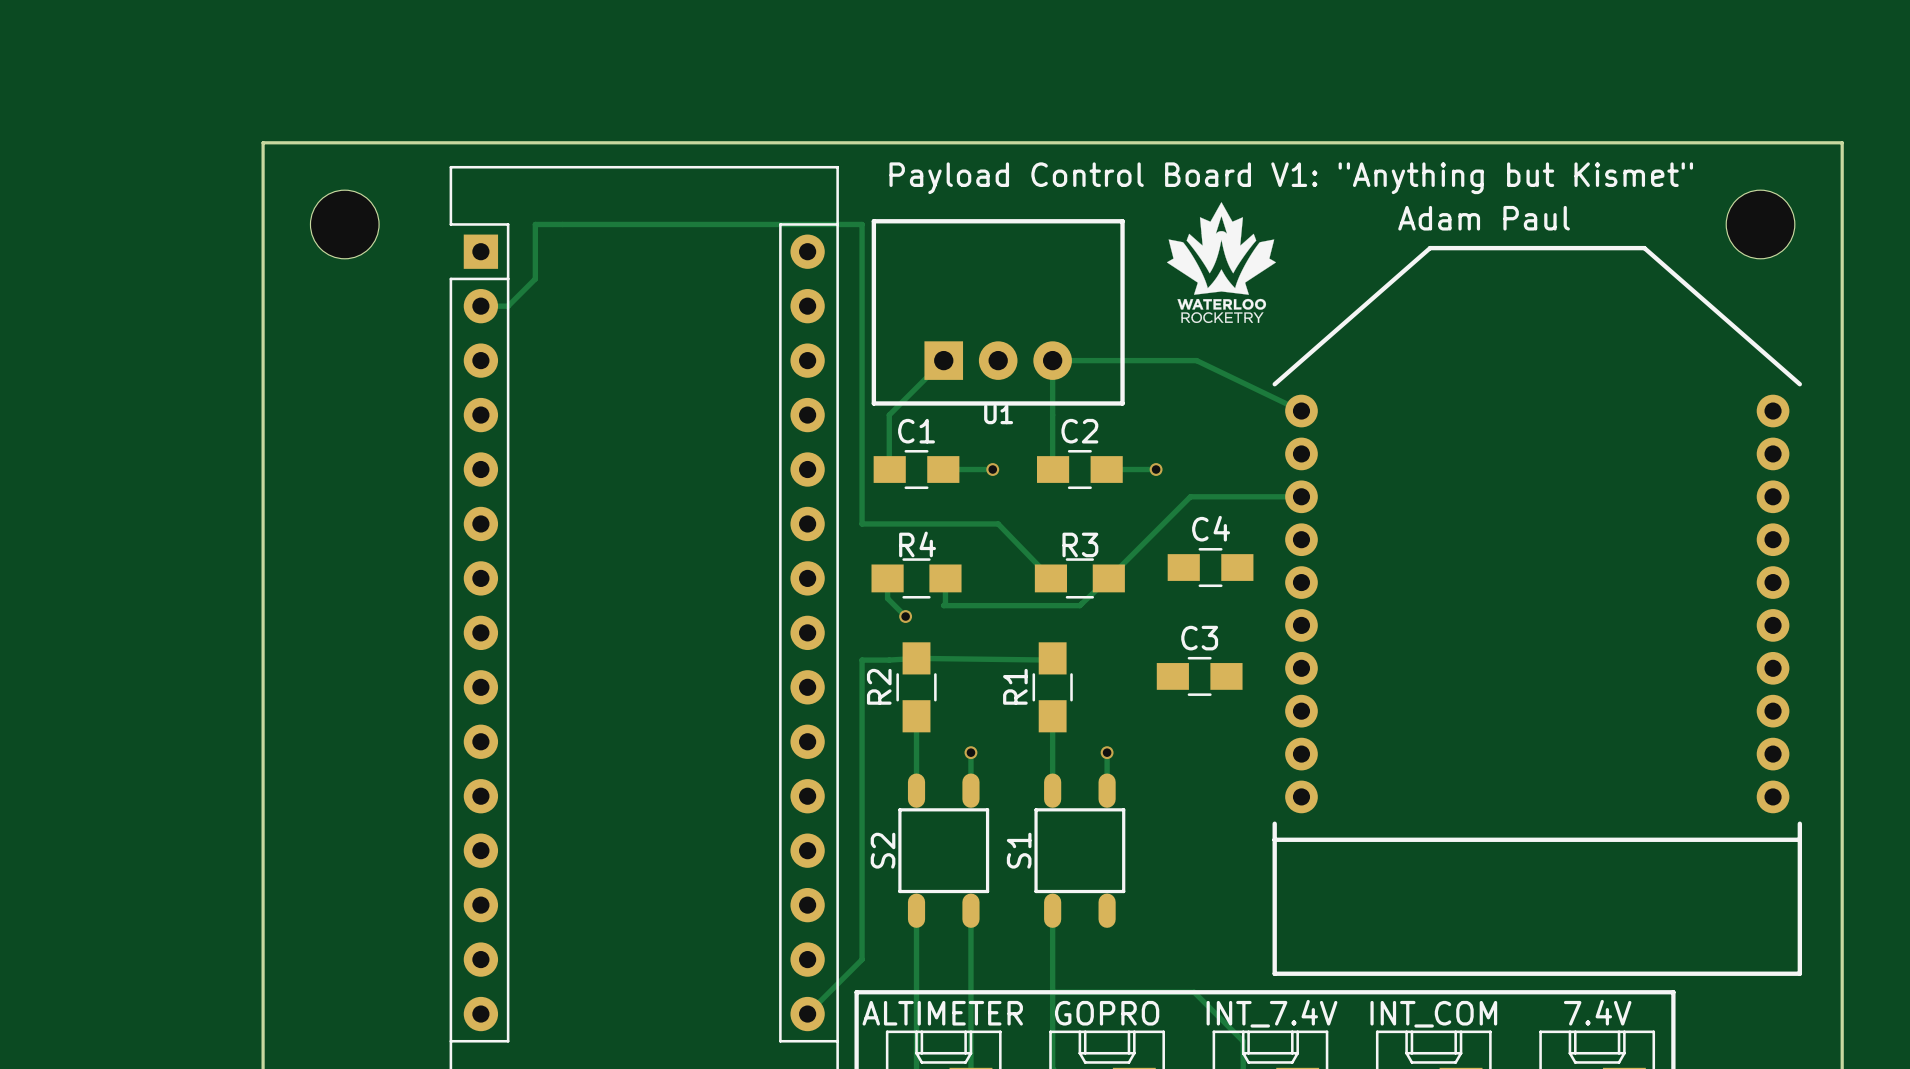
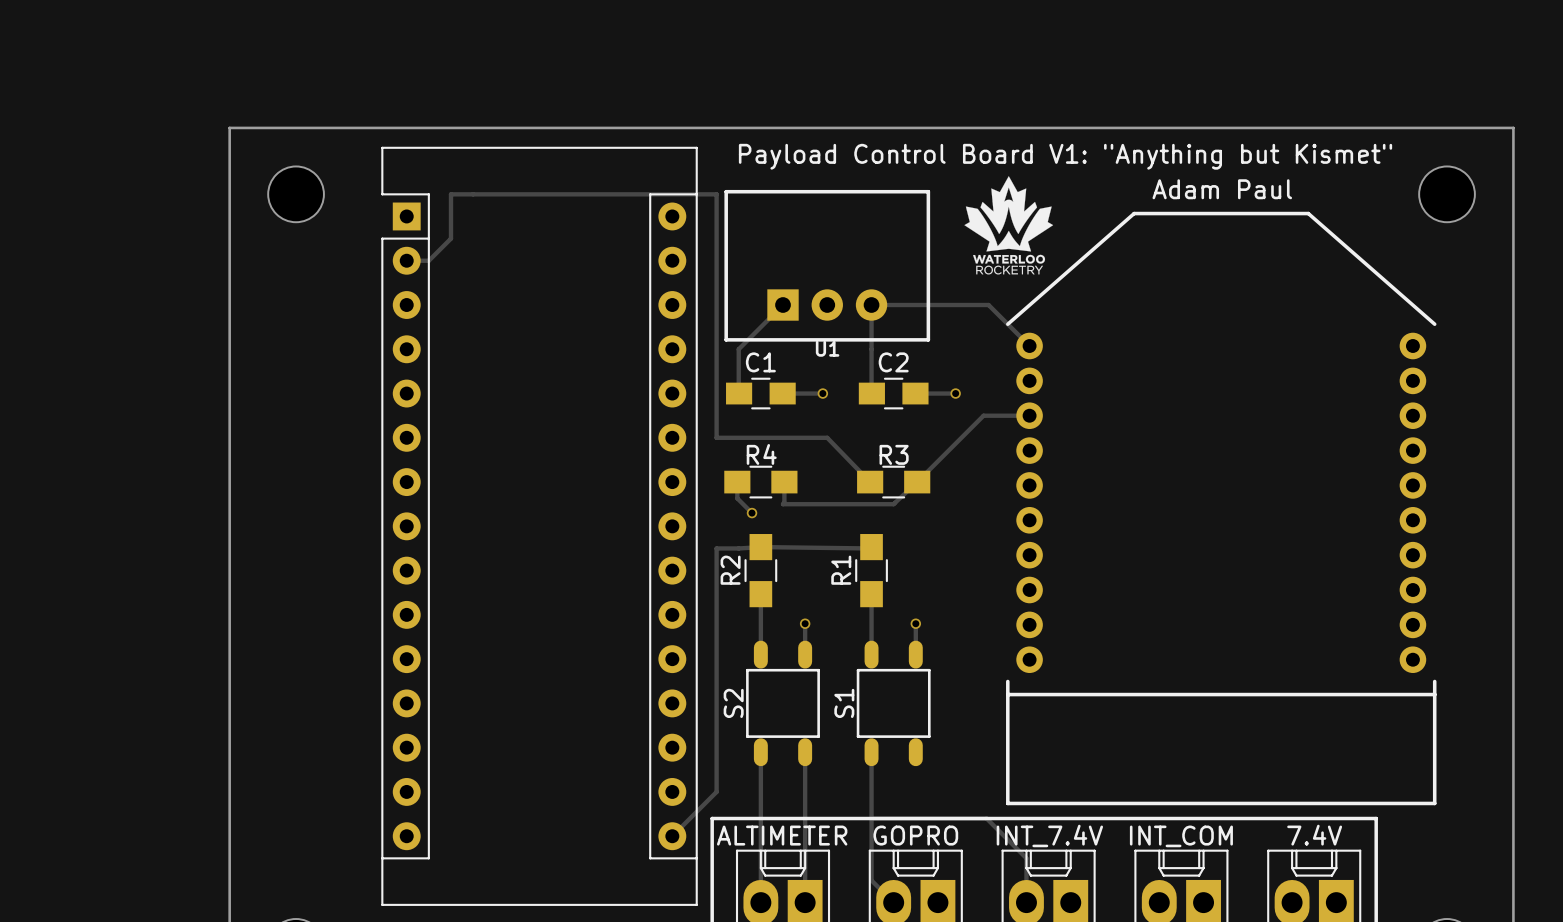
track: (1196, 360) (1301, 411) -> (988, 305) (1029, 346)
track: (1247, 496) (1301, 496) -> none
C4: (1210, 567) -> none
part position: (1537, 610) -> (1221, 508)
C3: (1199, 676) -> none

